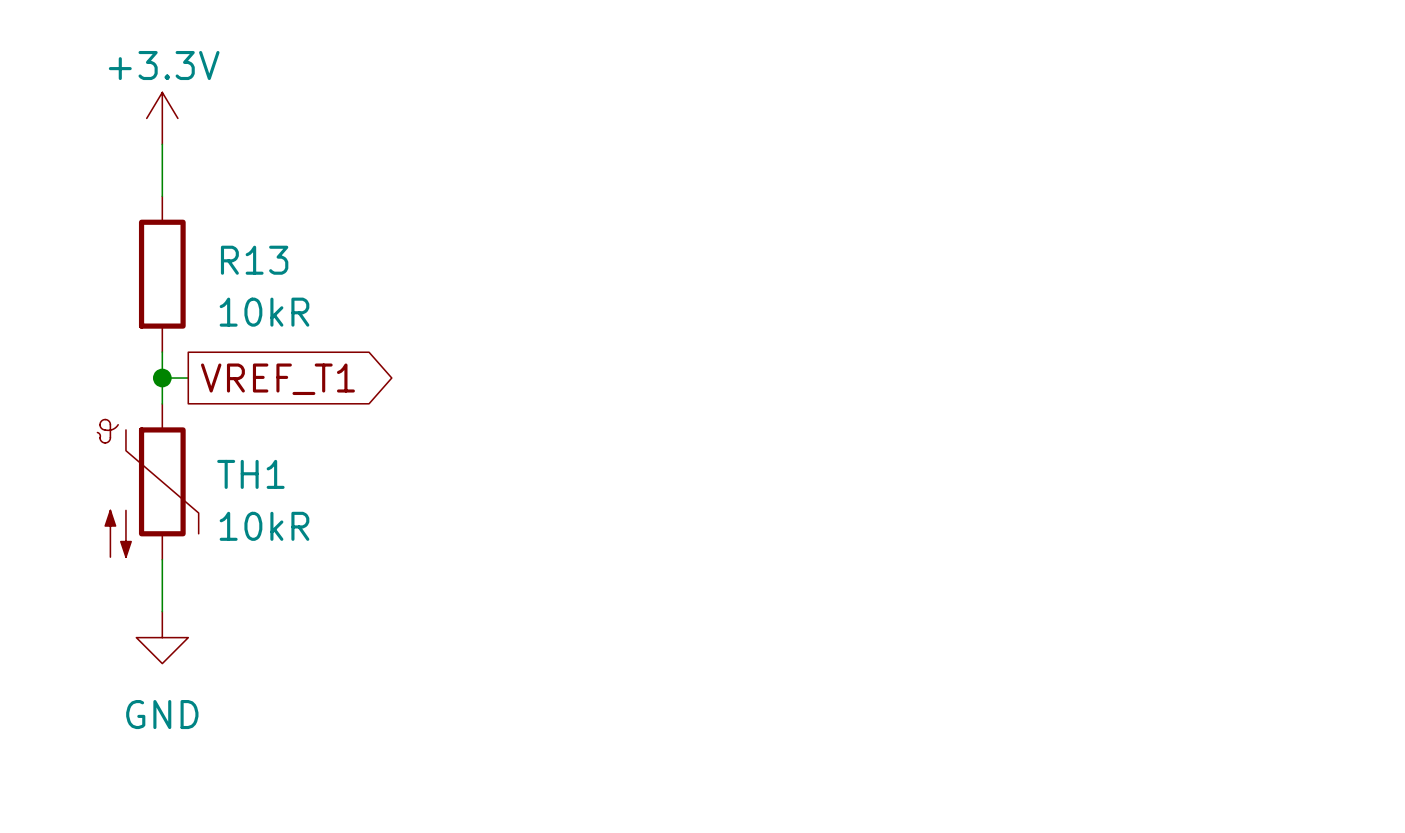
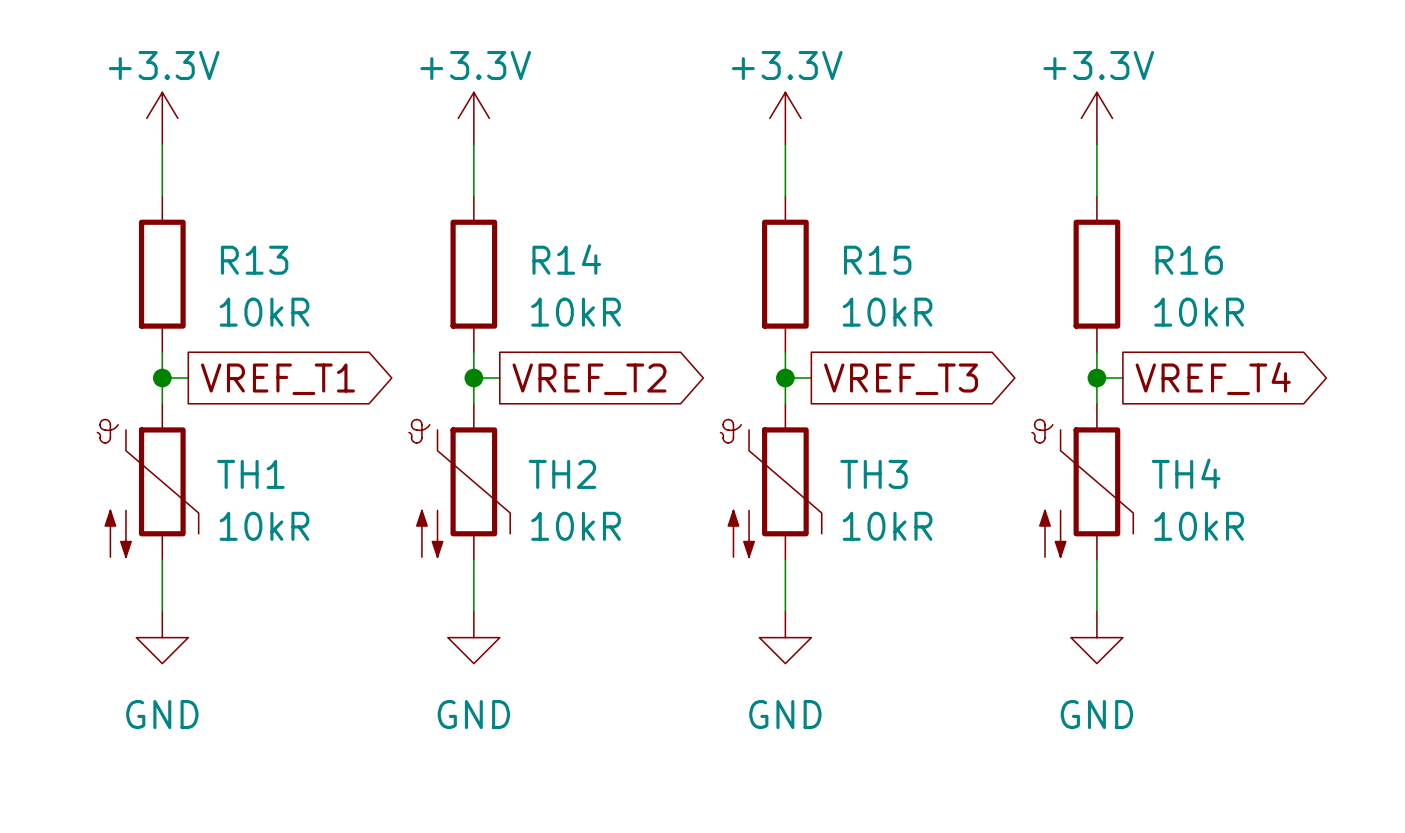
power symbol: none -> +3.3V (473, 118)
power symbol: none -> +3.3V (785, 118)
power symbol: none -> +3.3V (1096, 118)
wire: none -> (473, 144) (473, 196)
wire: none -> (785, 144) (785, 196)
wire: none -> (1096, 144) (1096, 196)
R14: none -> 10kR (473, 274)
R15: none -> 10kR (785, 274)
R16: none -> 10kR (1096, 274)
wire: none -> (473, 352) (473, 403)
wire: none -> (785, 352) (785, 403)
wire: none -> (1096, 352) (1096, 403)
wire: none -> (473, 378) (499, 378)
junction: none -> (473, 378)
wire: none -> (785, 378) (811, 378)
junction: none -> (785, 378)
wire: none -> (1096, 378) (1122, 378)
junction: none -> (1096, 378)
global label: none -> VREF_T4 (1213, 378)
global label: none -> VREF_T2 (589, 379)
global label: none -> VREF_T3 (901, 379)
TH2: none -> 10kR (459, 481)
TH3: none -> 10kR (771, 481)
TH4: none -> 10kR (1082, 481)
wire: none -> (473, 559) (473, 611)
wire: none -> (785, 559) (785, 611)
wire: none -> (1096, 559) (1096, 611)
power symbol: none -> GND (473, 637)
power symbol: none -> GND (785, 637)
power symbol: none -> GND (1096, 637)

